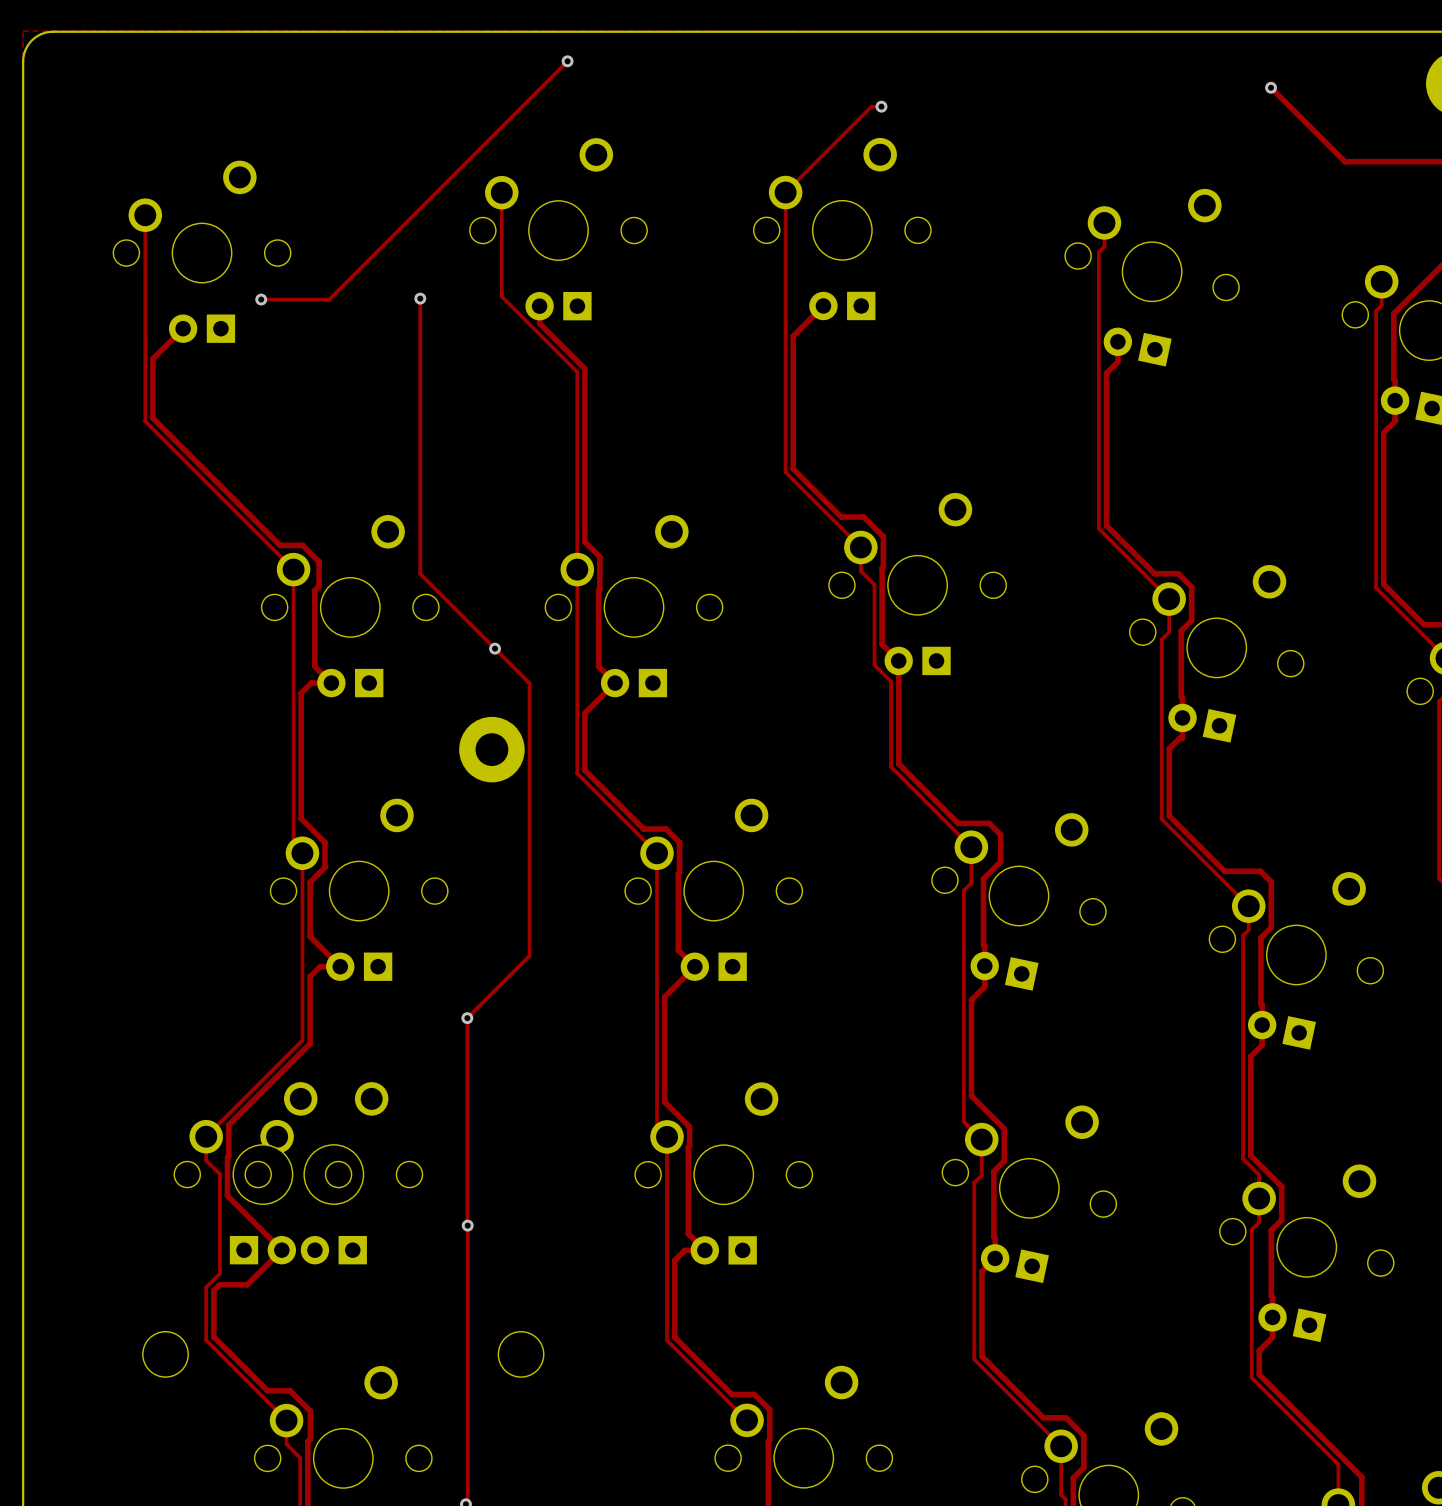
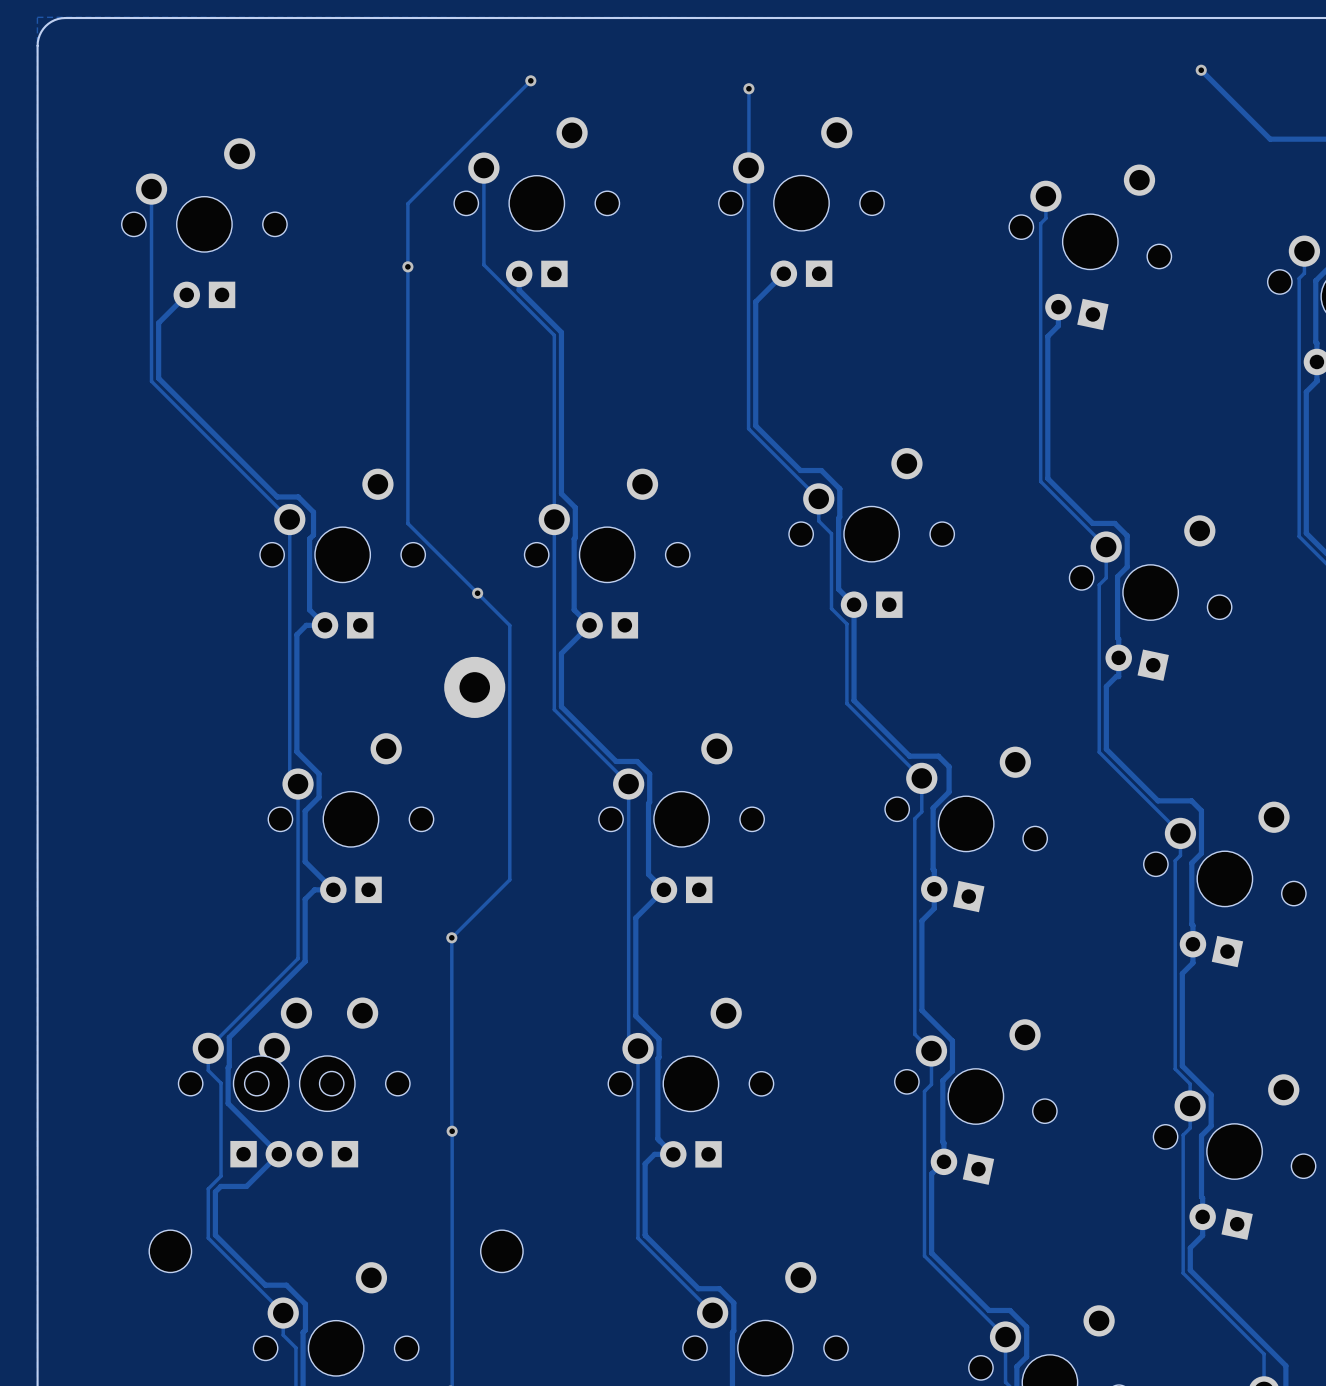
track: (567, 61) (329, 299) (261, 299) -> none
via position: (567, 61) -> (530, 80)
track: none -> (530, 80) (407, 203) (407, 266)
track: (881, 106) (871, 106) (785, 192) -> (748, 88) (748, 167)
via: (881, 106) -> none
via: none -> (748, 88)
via: (261, 299) -> none

